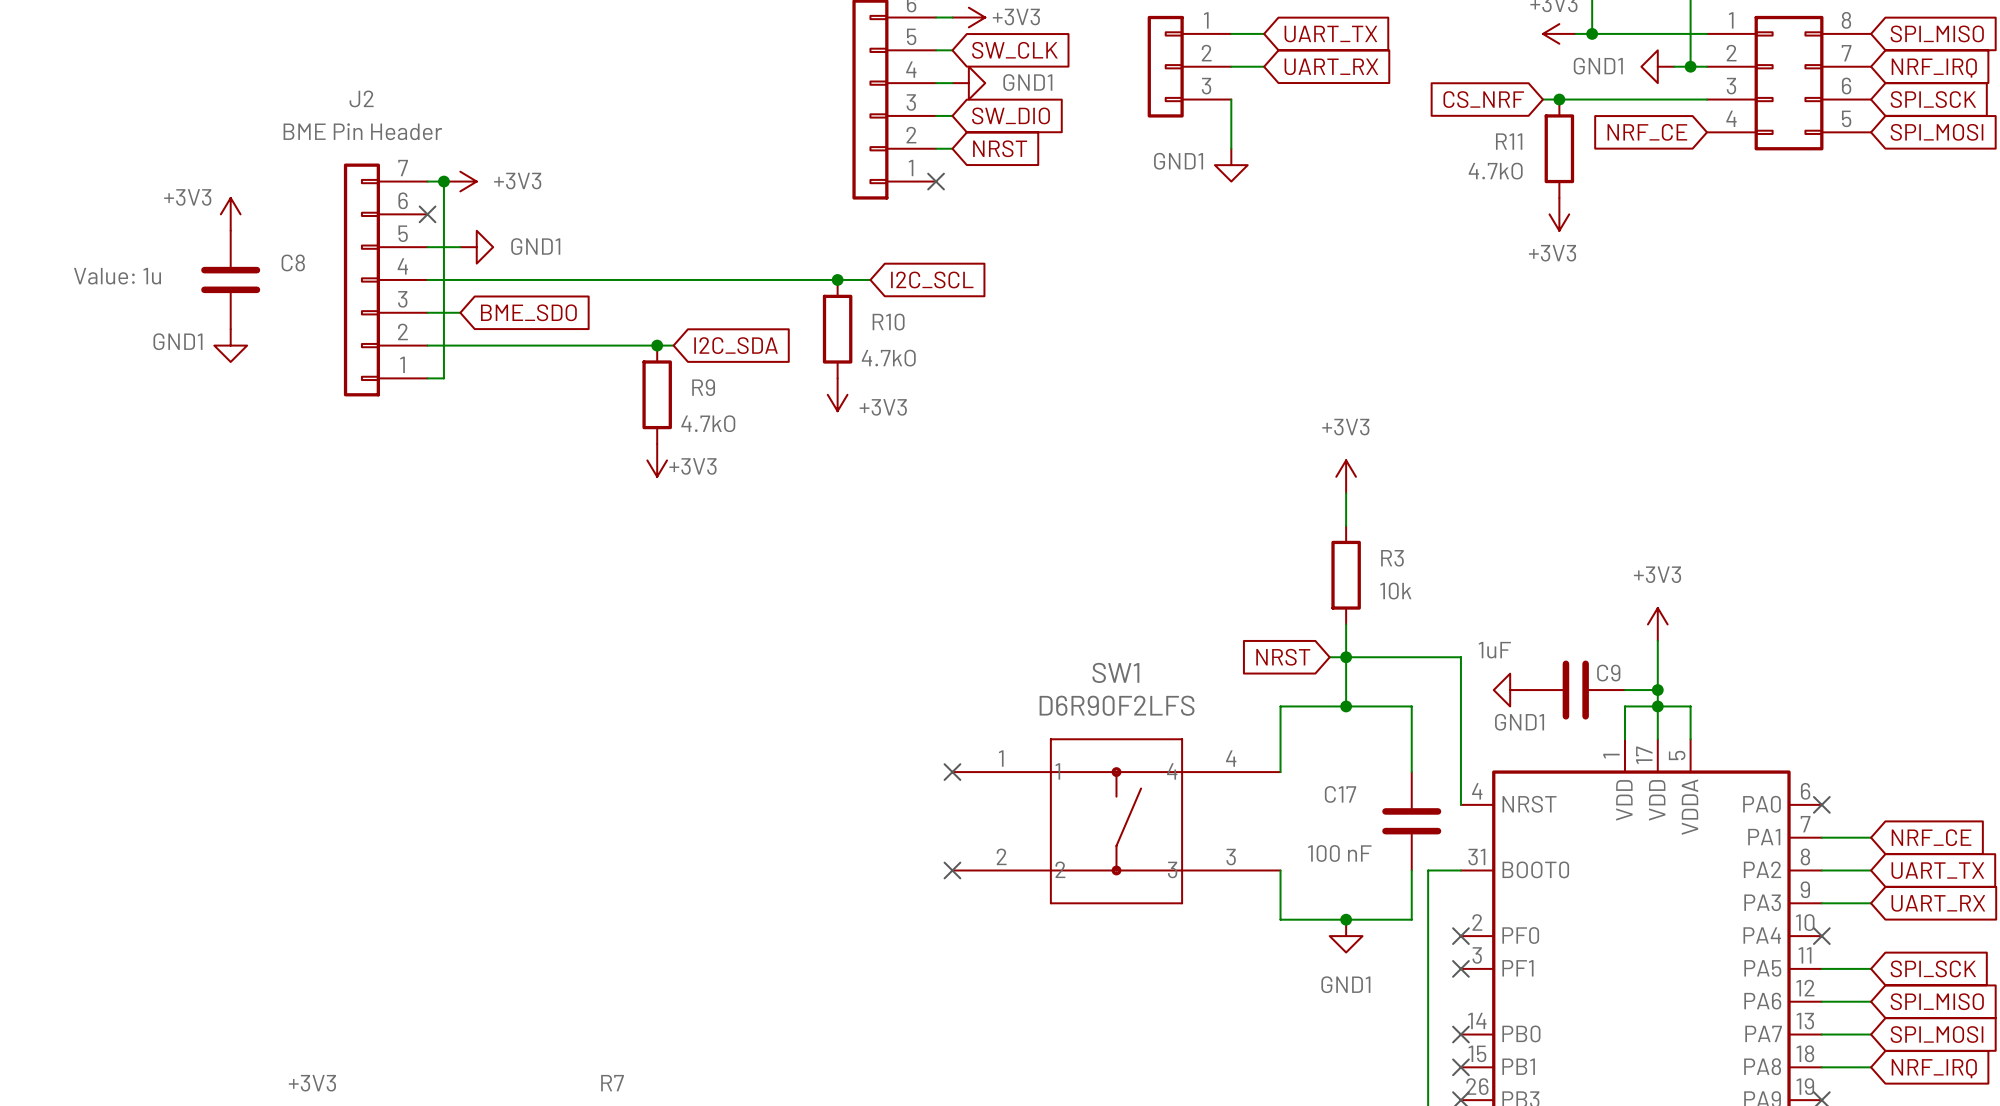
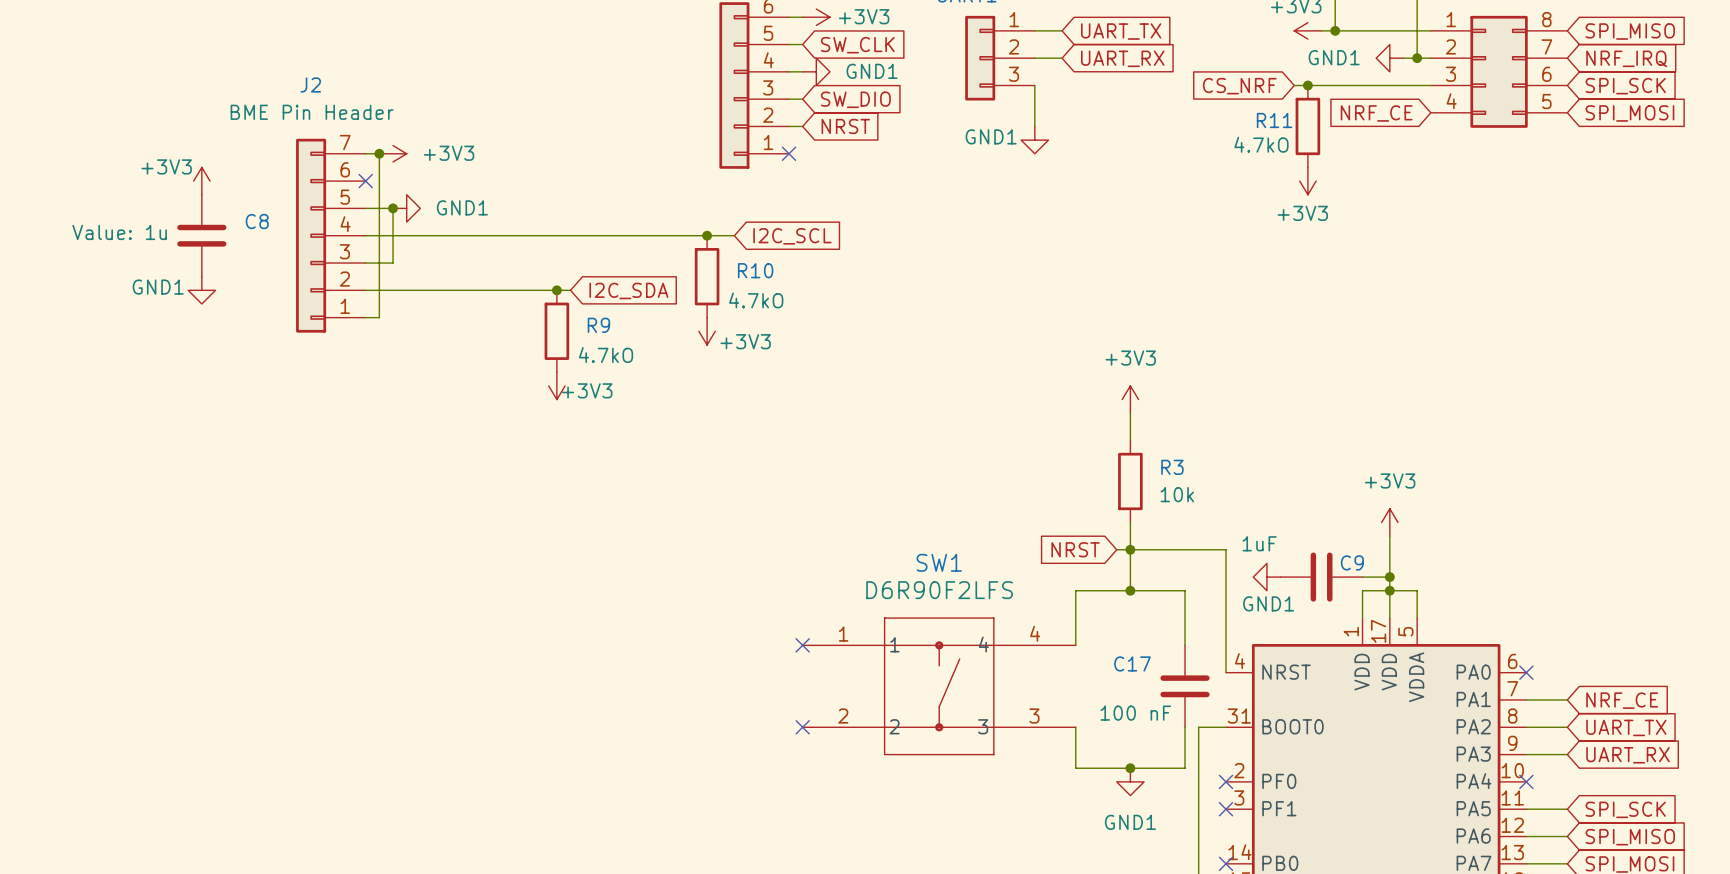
wire: none -> (393, 208) (393, 263)
junction: none -> (393, 208)
global label: BME_SDO (528, 312) -> none

